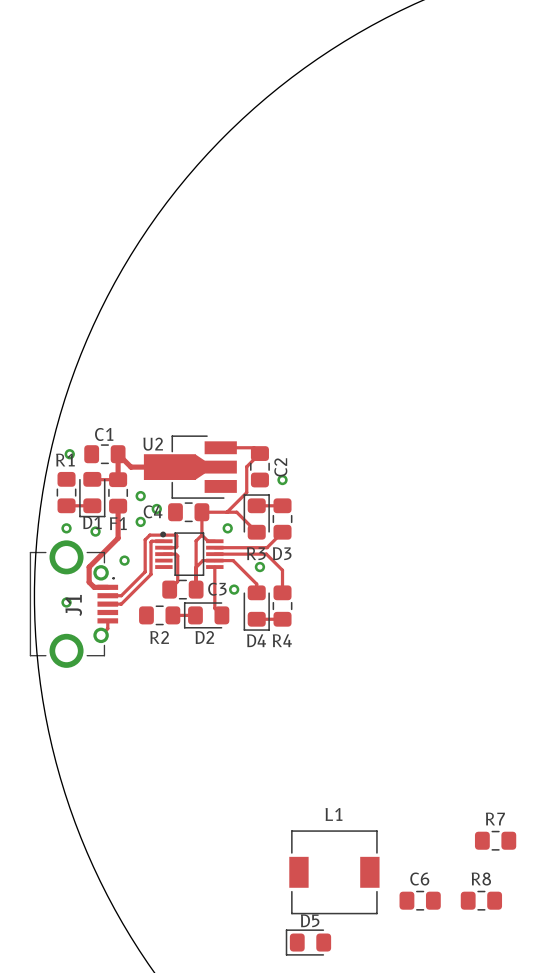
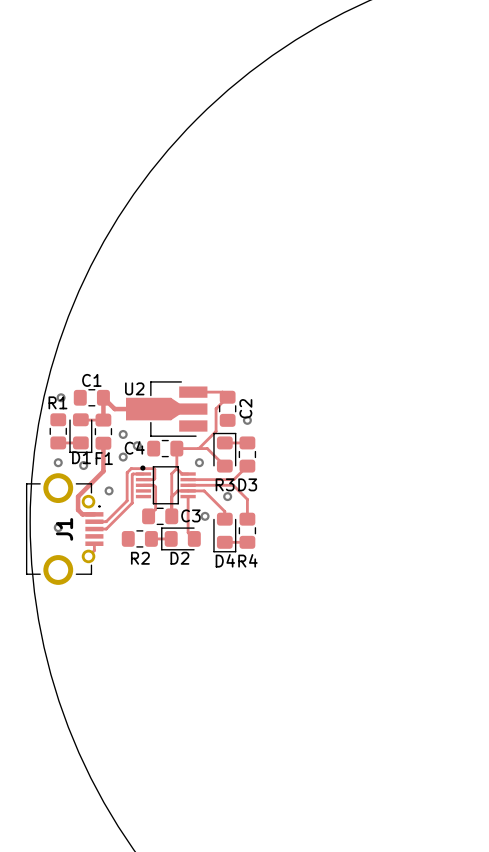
R7: (495, 840) -> none
L1: (334, 872) -> none
C6: (420, 900) -> none
R8: (481, 900) -> none
D5: (308, 942) -> none

